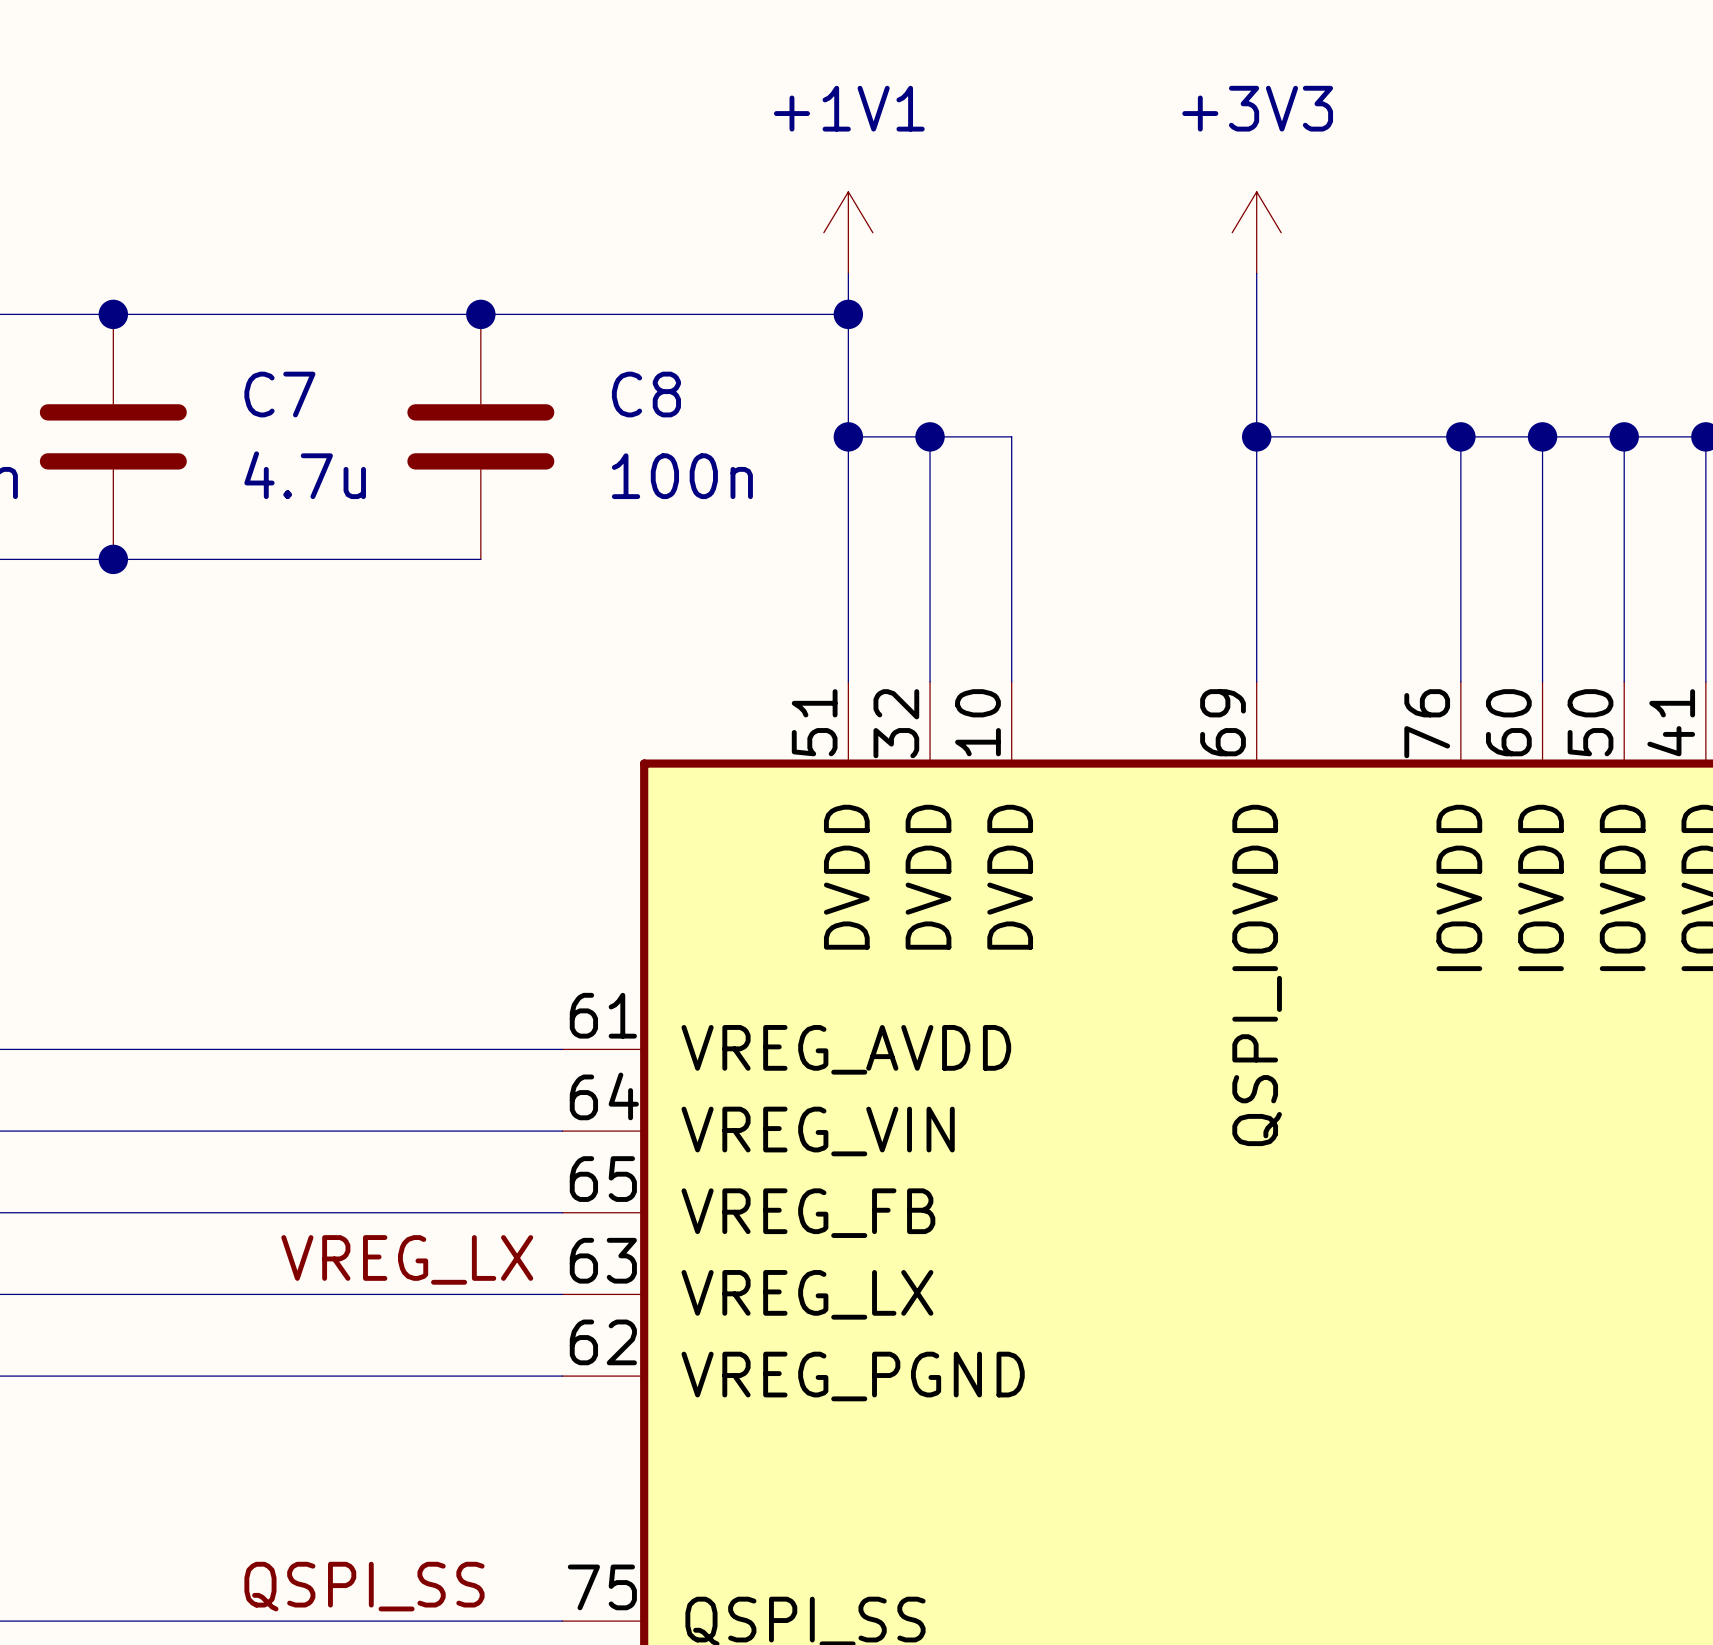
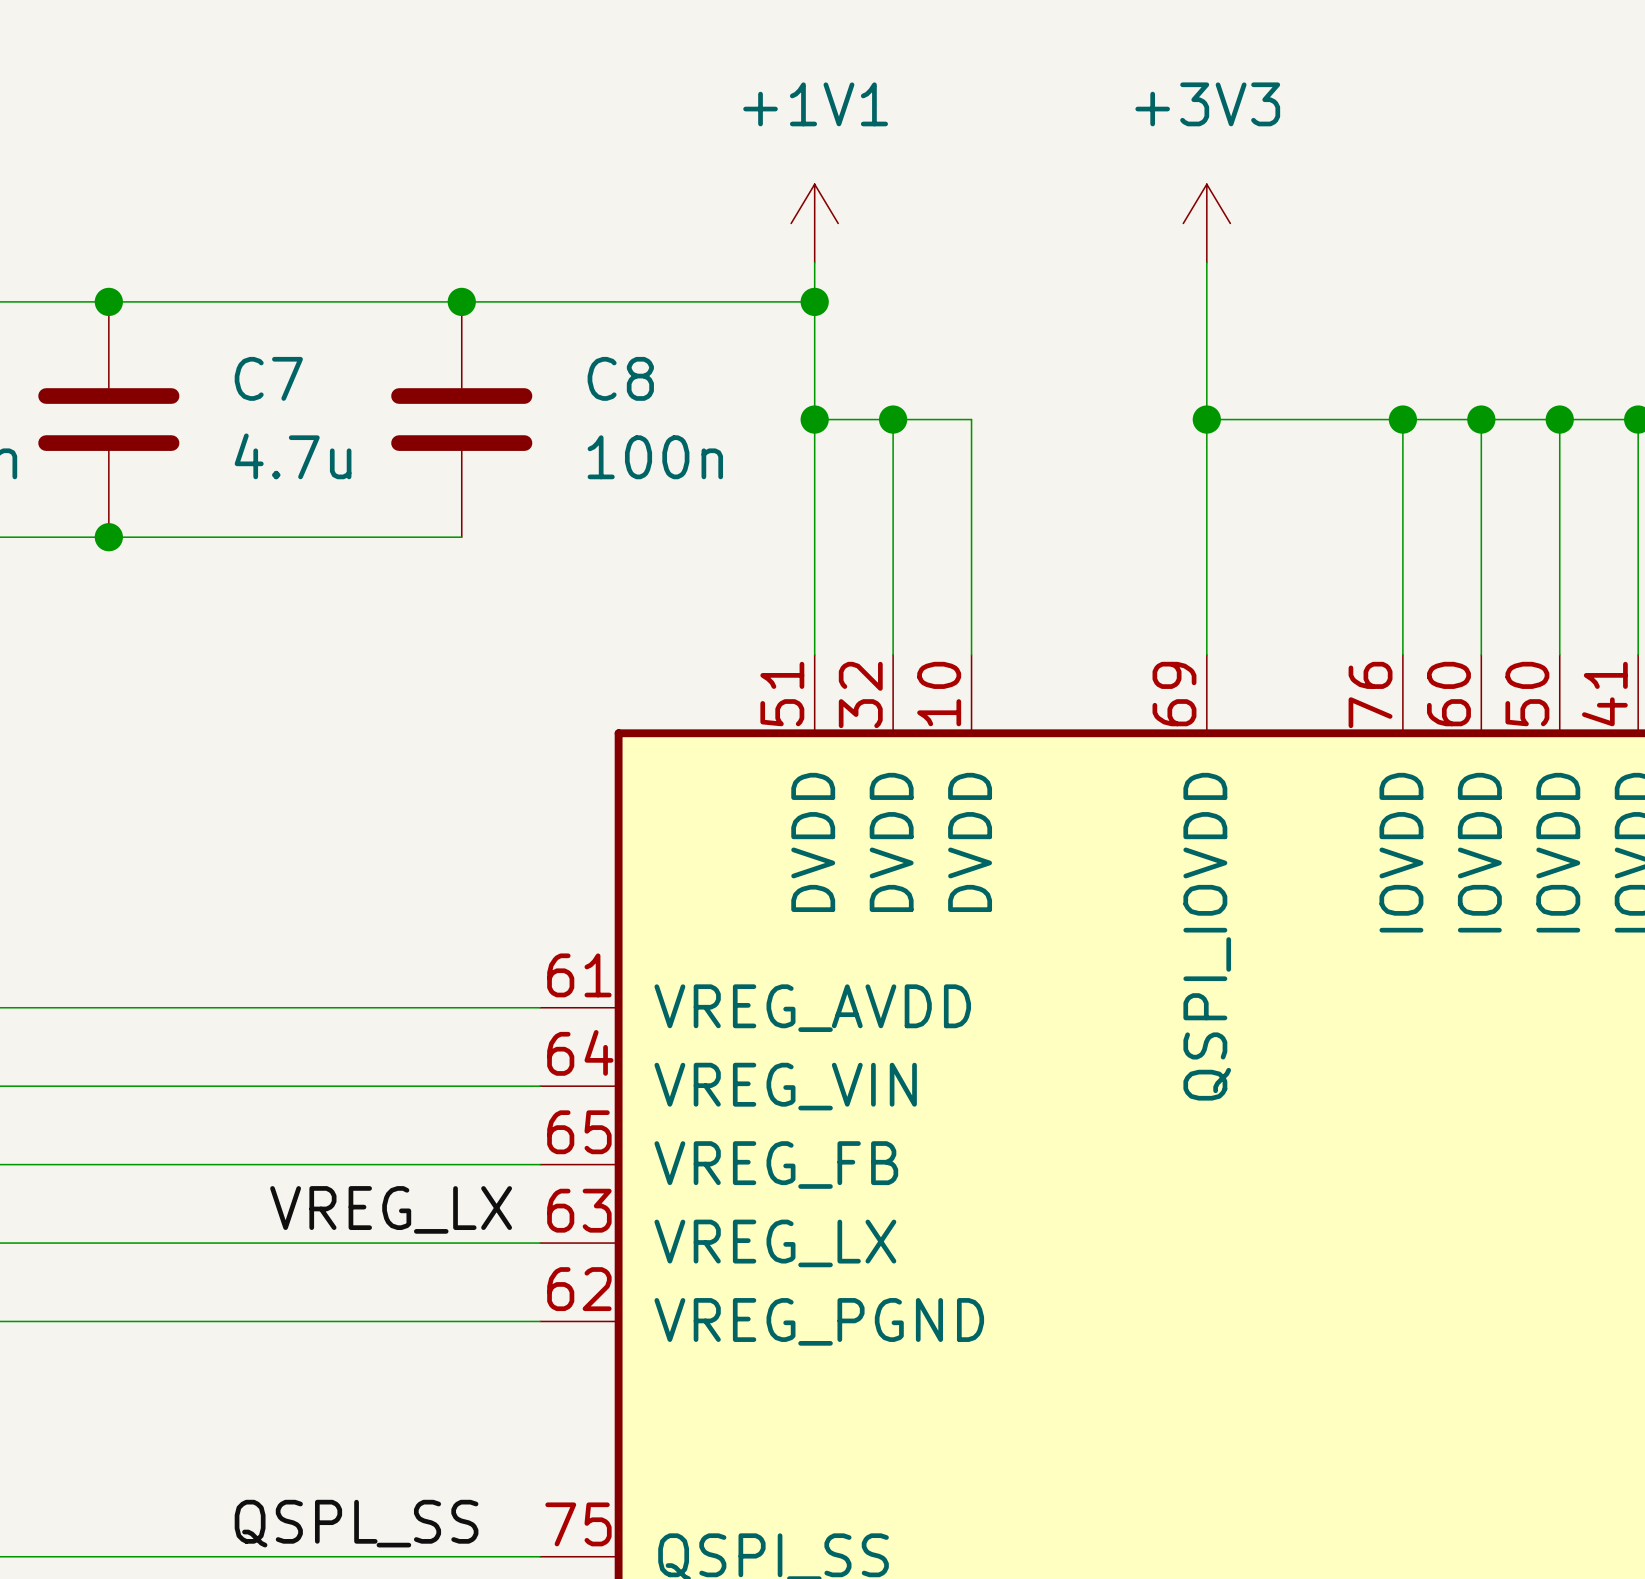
label: QSPI_SS (364, 1586) -> QSPL_SS (356, 1523)

